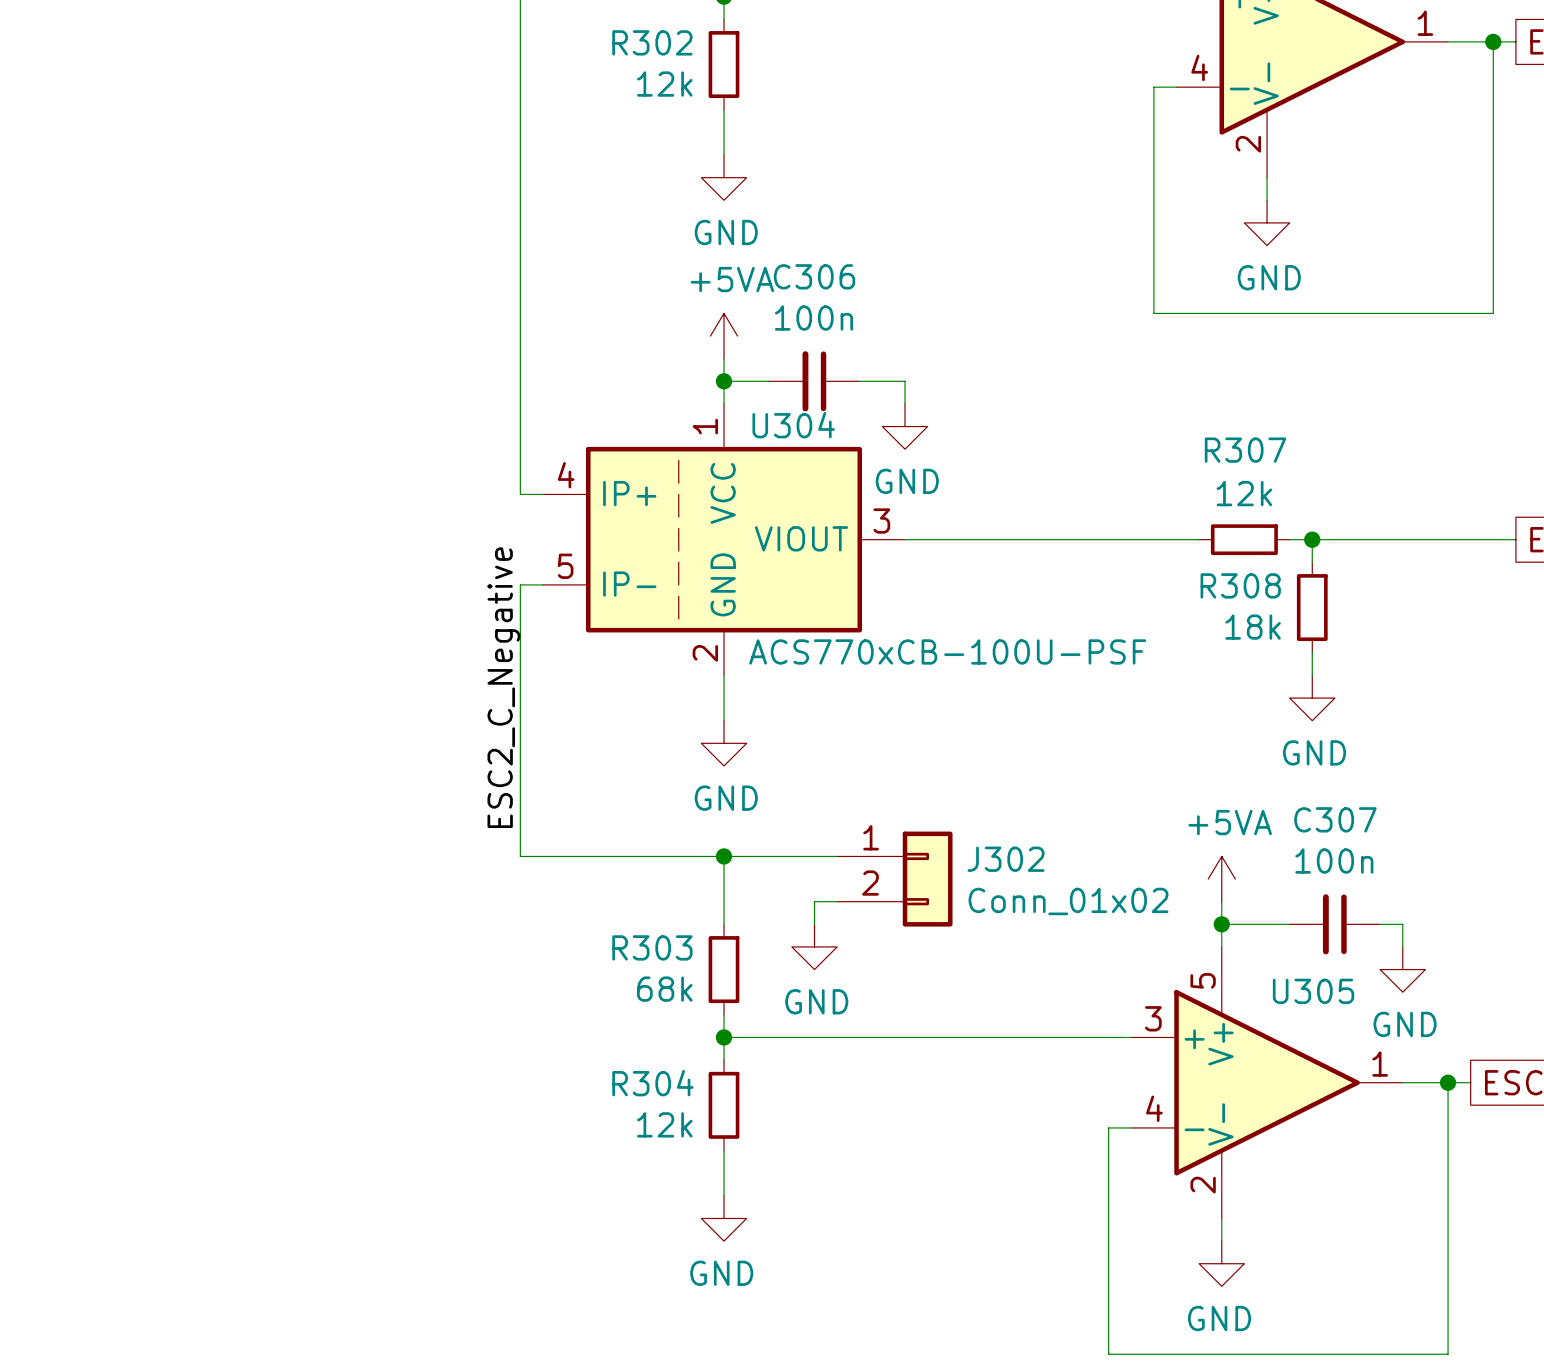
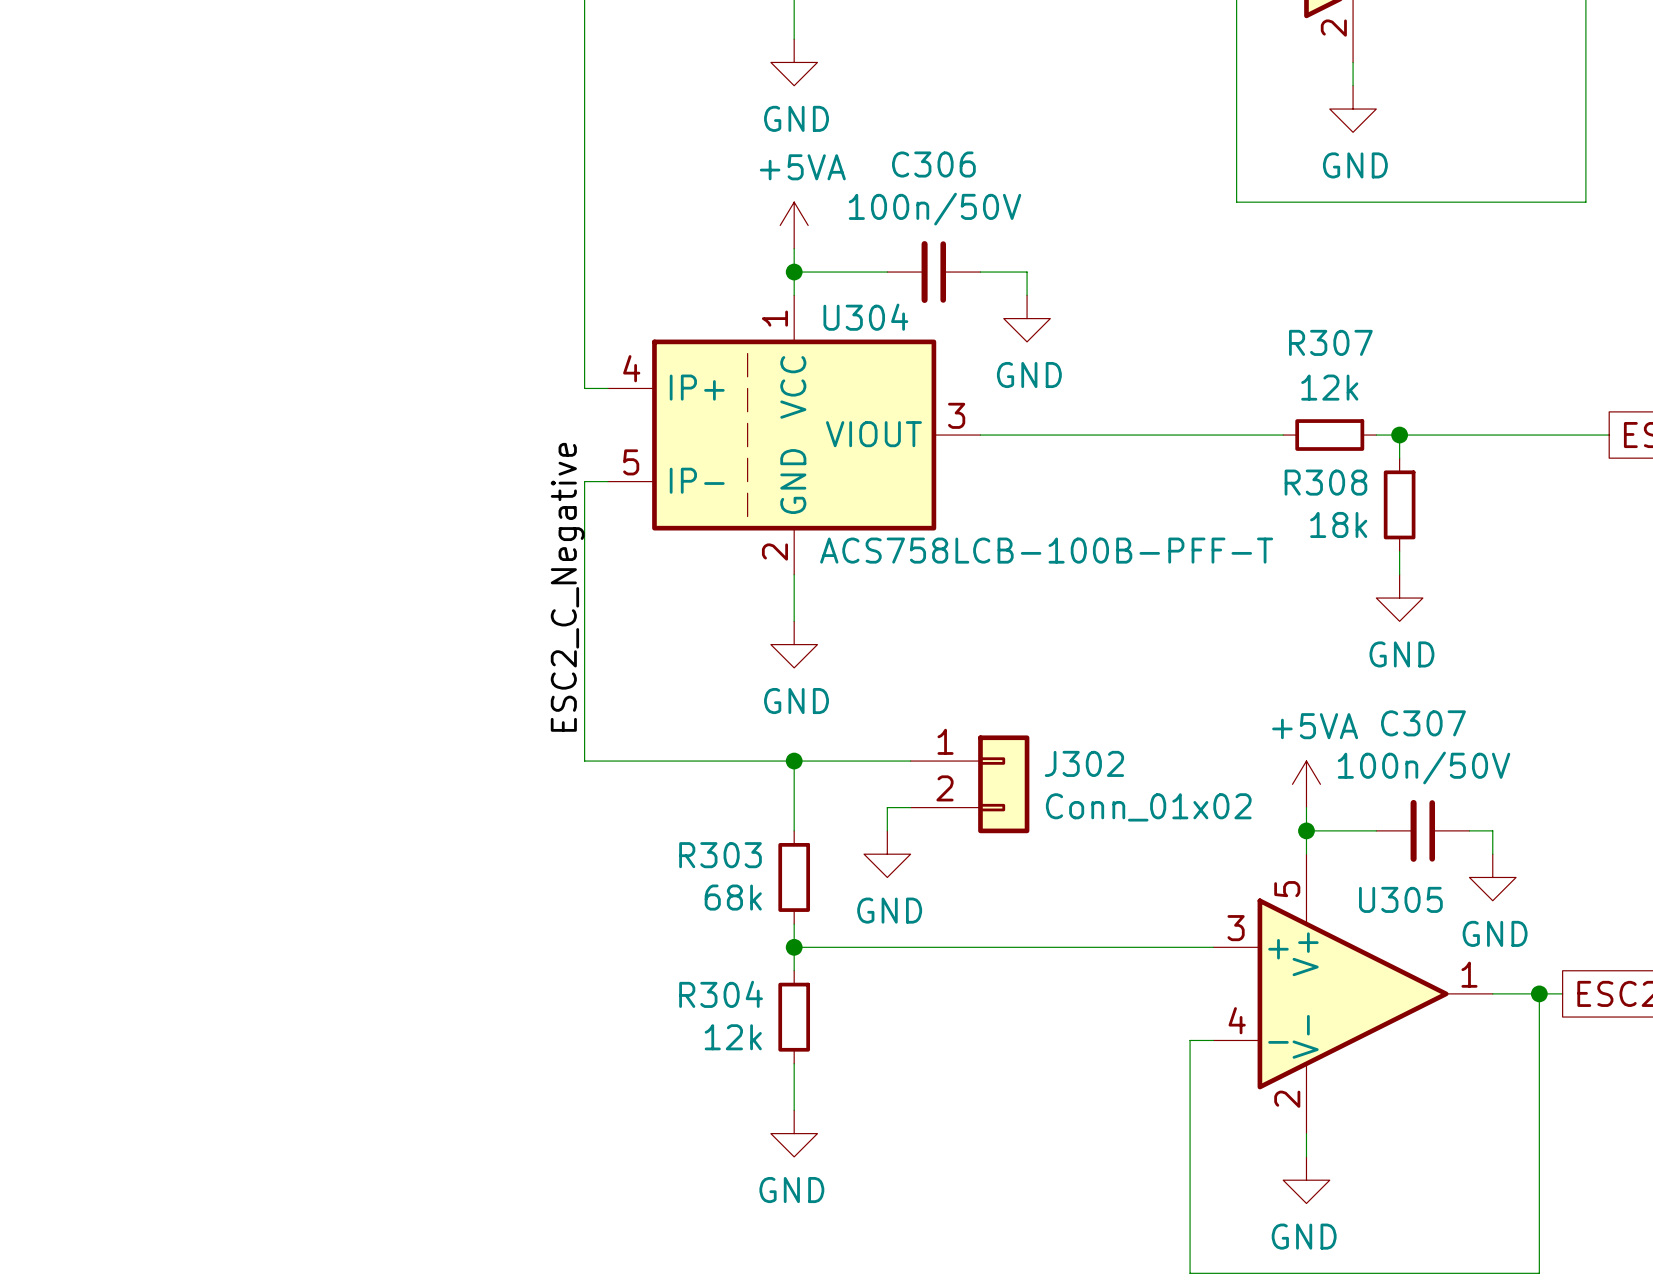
C306 value: 100n (813, 318) -> 100n/50V (935, 209)
C306 position: (814, 381) -> (933, 272)
wire: (859, 381) (905, 381) (905, 403) -> (980, 272) (1027, 272) (1027, 295)
power symbol position: GND (905, 426) -> GND (1027, 318)
U304 value: ACS770xCB-100U-PSF (947, 651) -> ACS758LCB-100B-PFF-T (1046, 550)
C307 value: 100n (1334, 861) -> 100n/50V (1424, 767)

